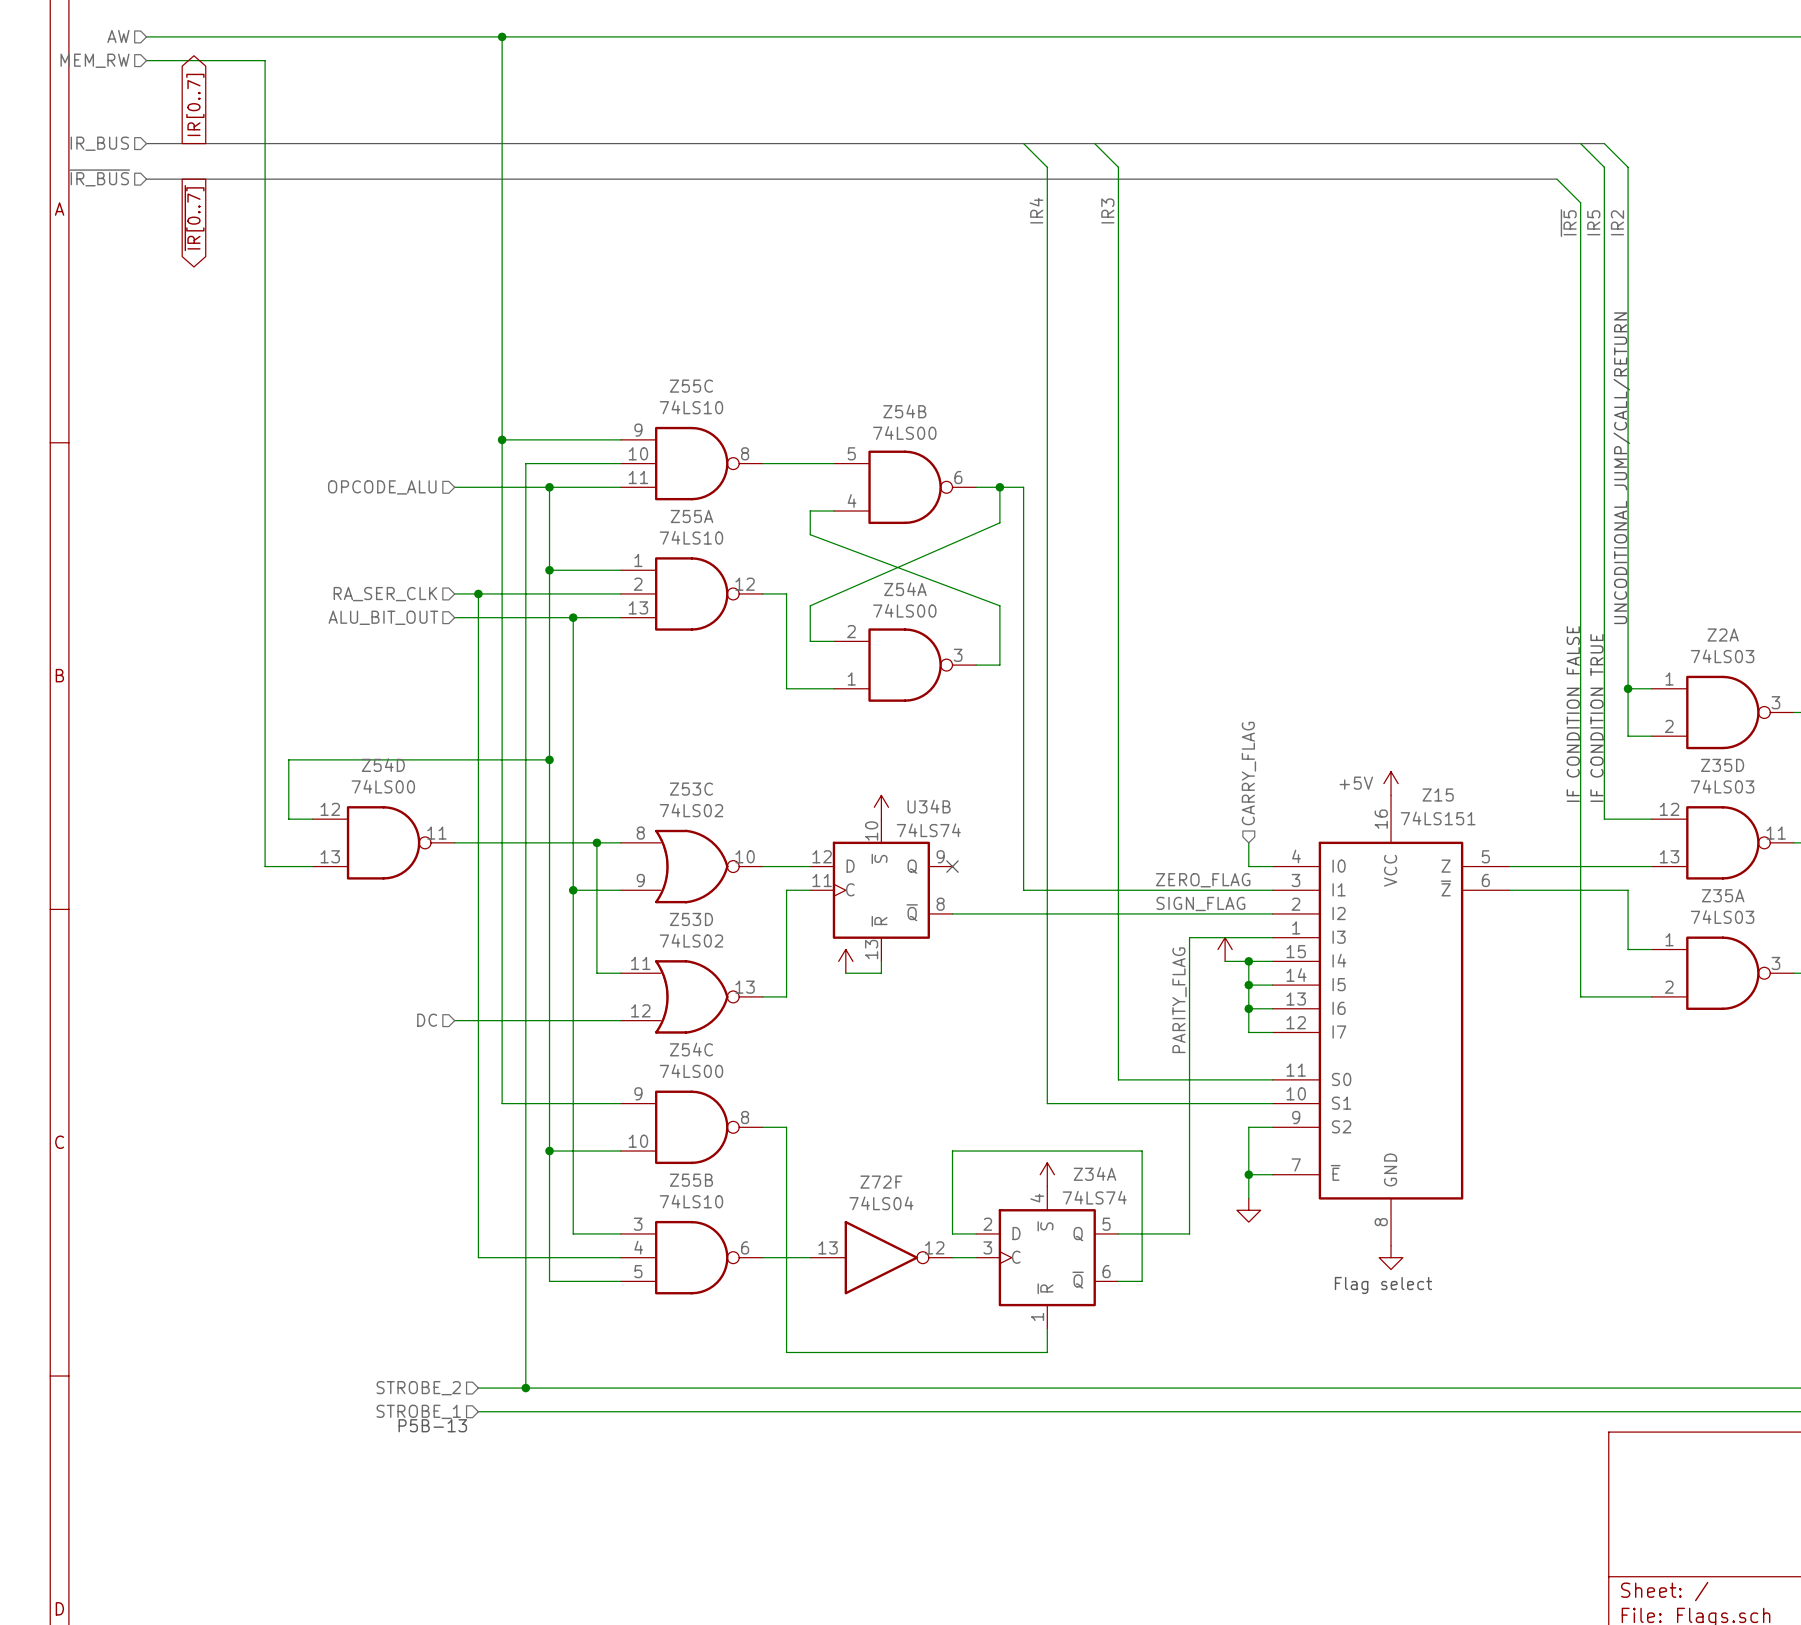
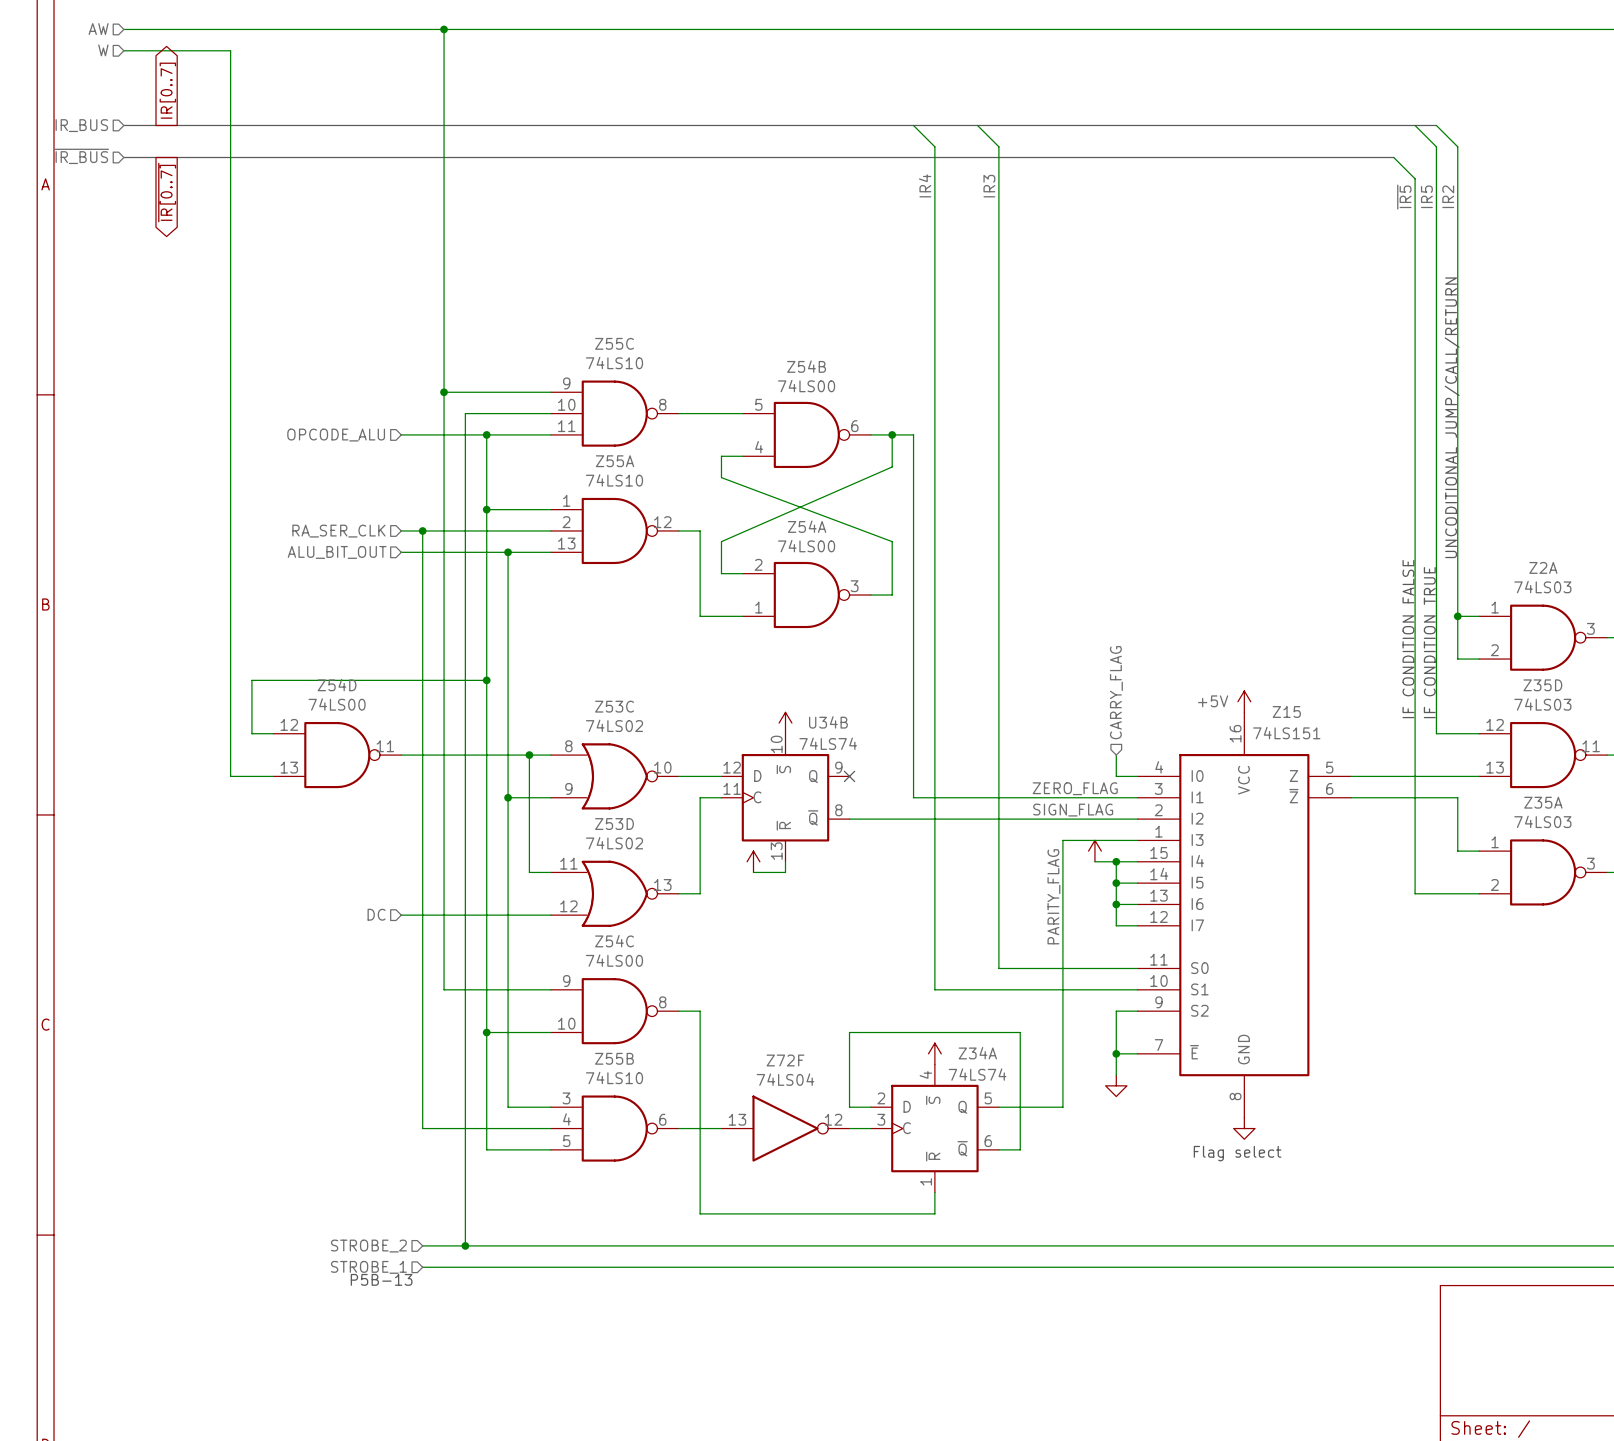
hierarchical label: MEM_RW (95, 60) -> W (103, 50)

